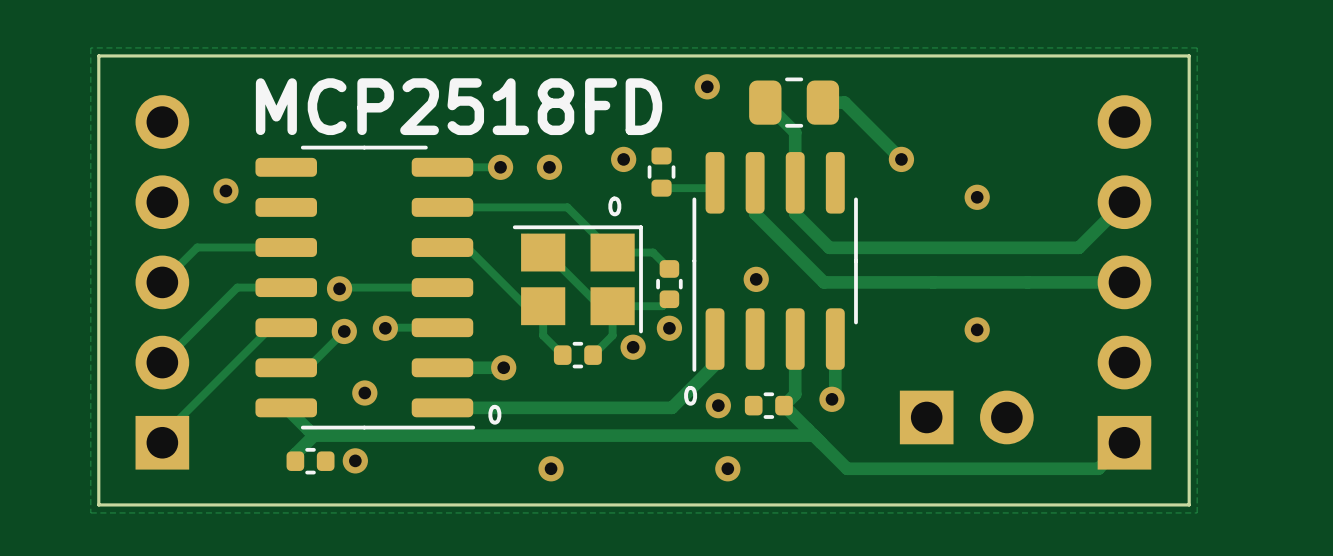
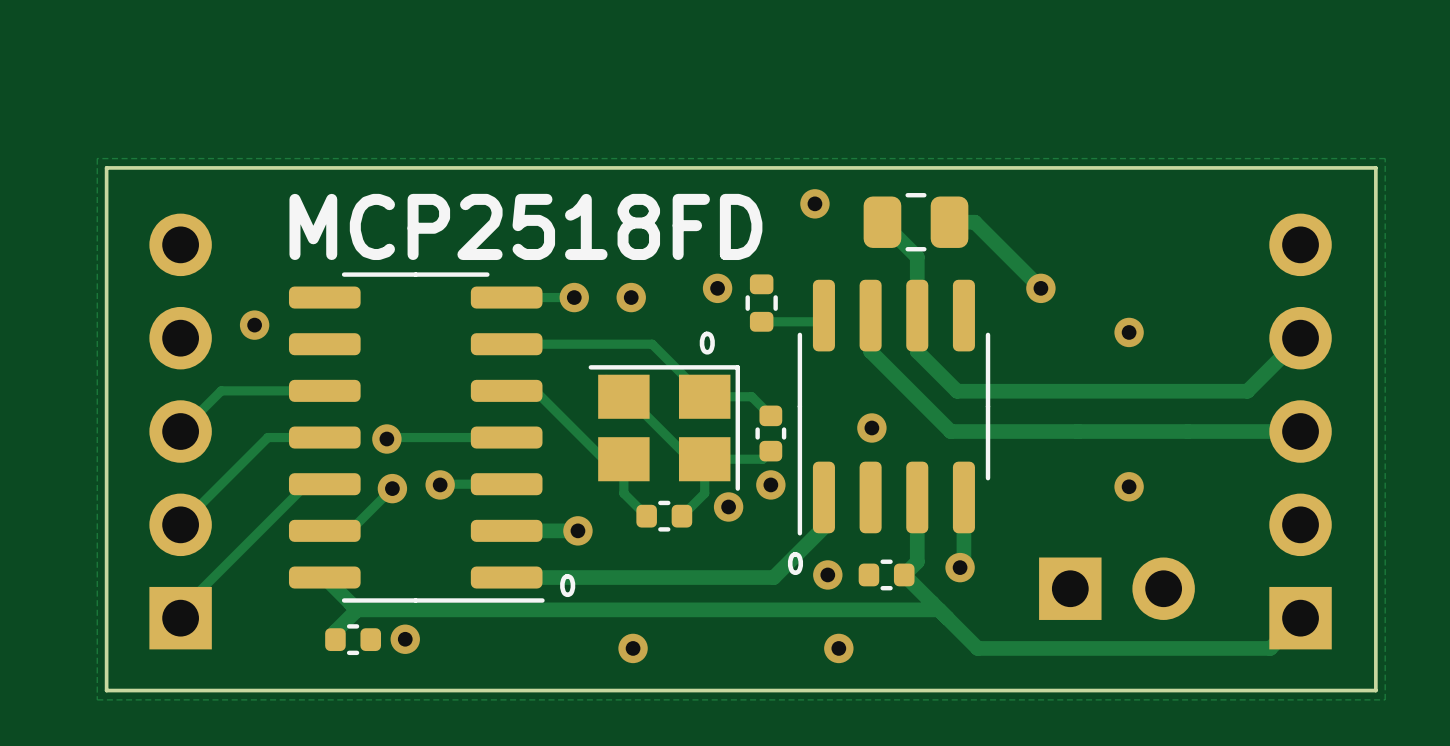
via: (364, 393) -> none

